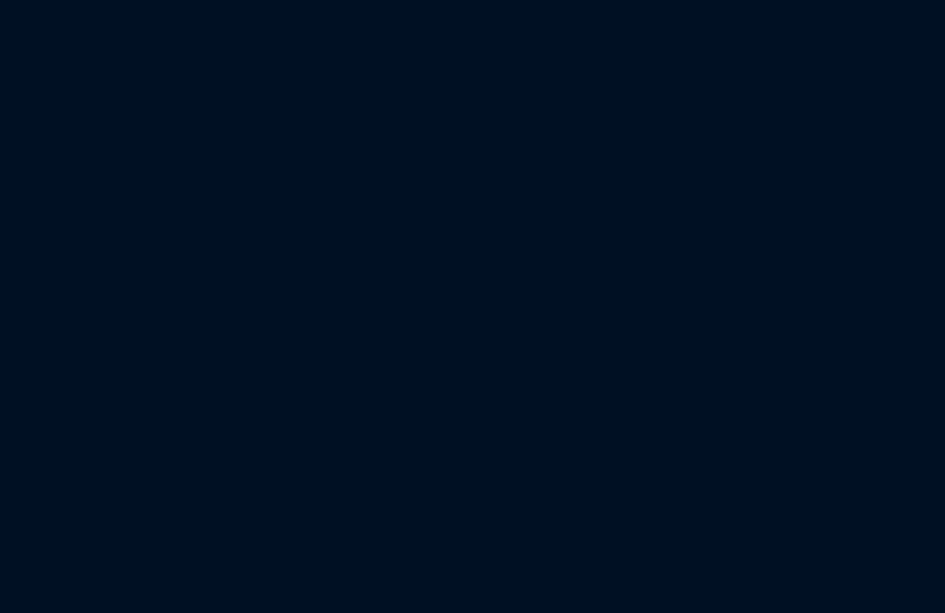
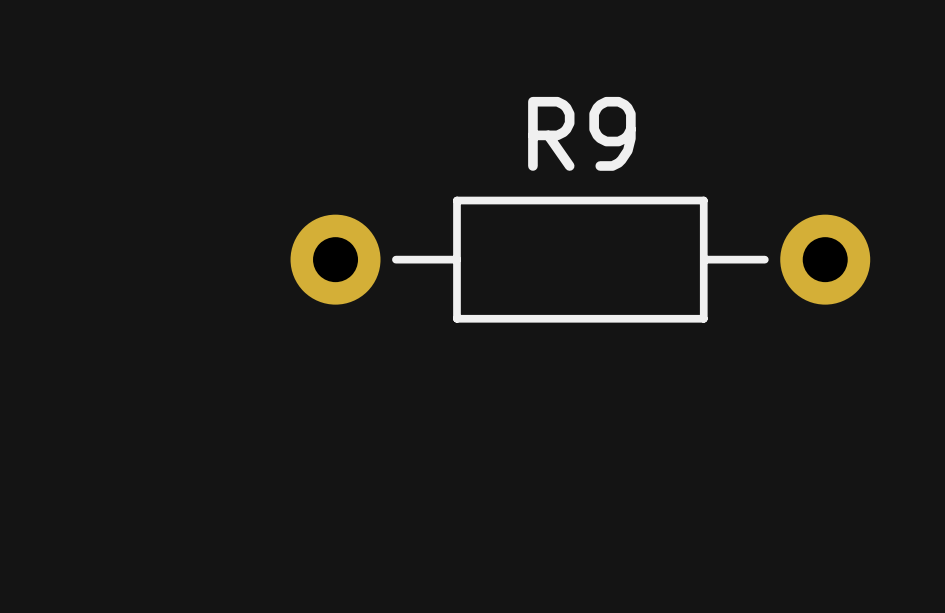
R9: none -> (580, 259)

